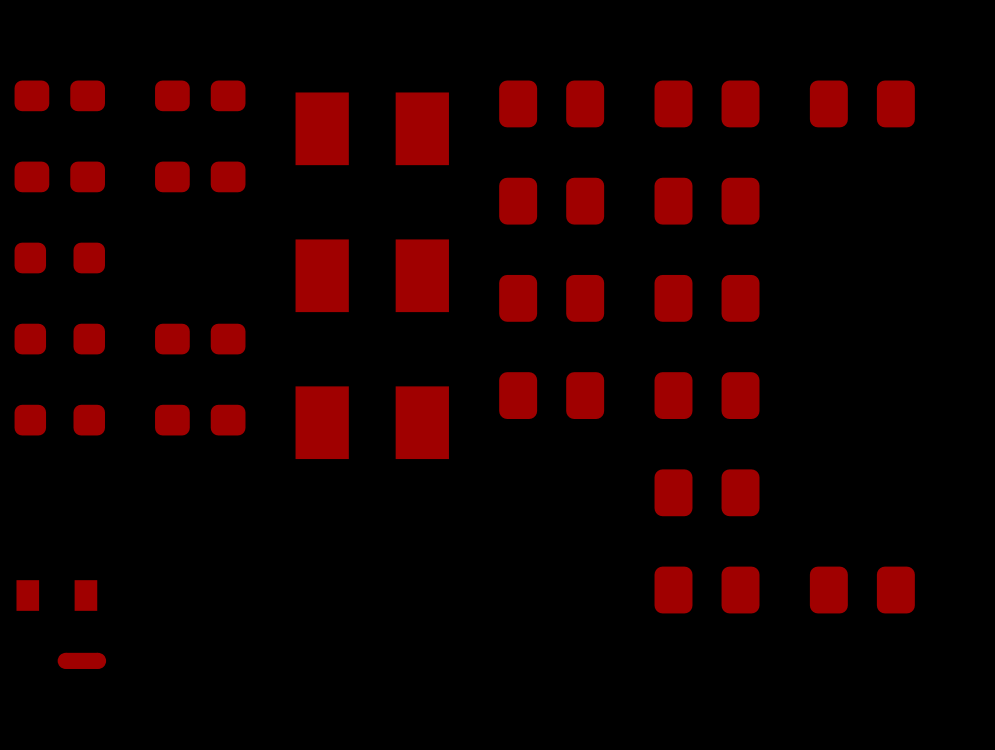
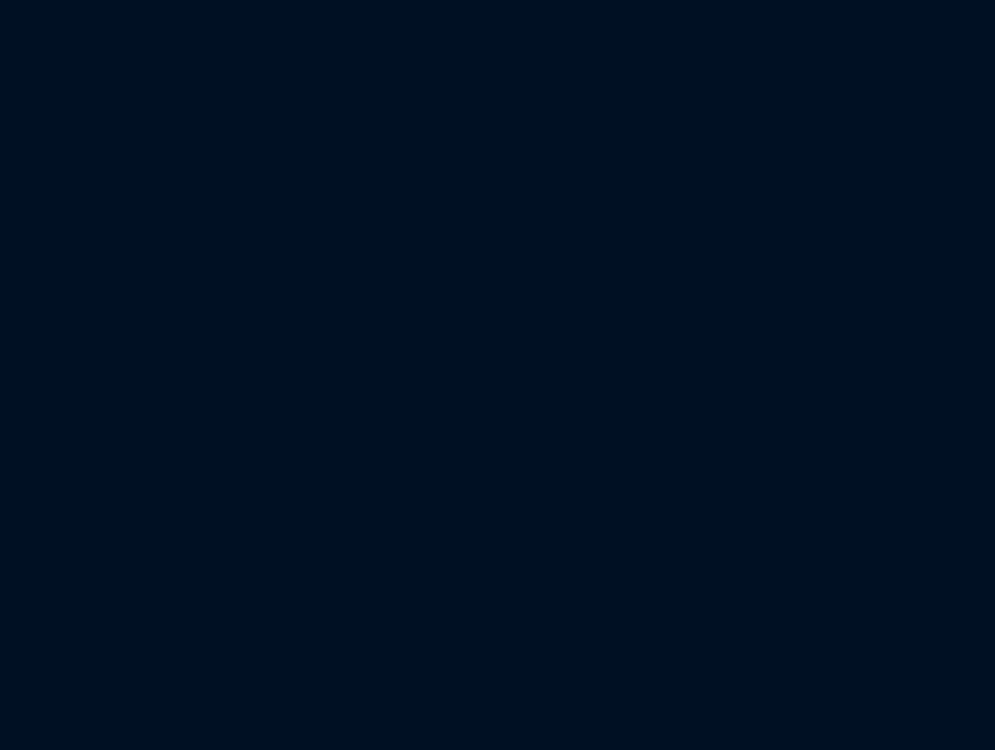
part: (59, 95) -> none
part: (200, 95) -> none
part: (551, 103) -> none
part: (707, 103) -> none
part: (862, 103) -> none
part: (372, 128) -> none
part: (59, 176) -> none
part: (200, 176) -> none
part: (551, 201) -> none
part: (707, 201) -> none
part: (59, 258) -> none
part: (372, 275) -> none
part: (551, 298) -> none
part: (707, 298) -> none
part: (59, 339) -> none
part: (200, 339) -> none
part: (551, 395) -> none
part: (707, 395) -> none
part: (59, 420) -> none
part: (200, 420) -> none
part: (372, 422) -> none
part: (707, 492) -> none
part: (707, 590) -> none
part: (862, 590) -> none
part: (56, 595) -> none
part: (81, 660) -> none

